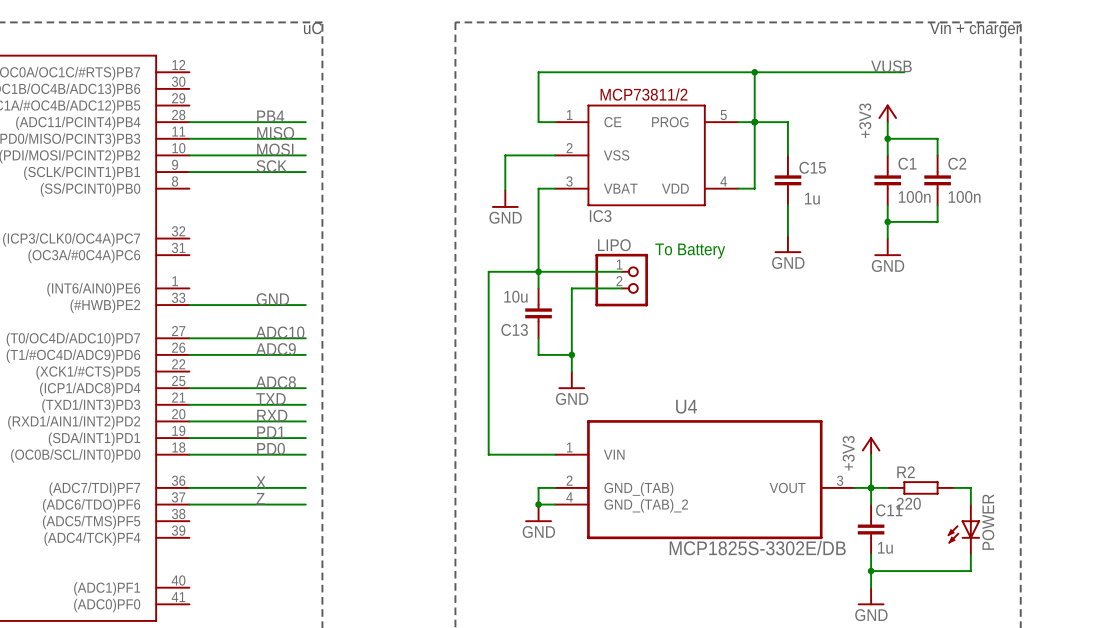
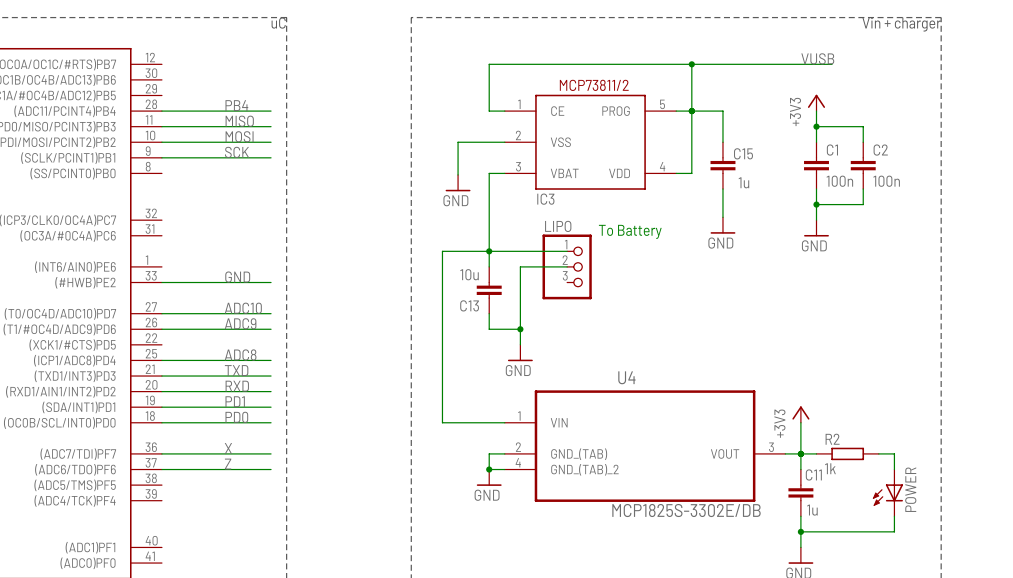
LIPO: (621, 280) -> none
LIPO: none -> (567, 266)
R2 value: 220 (908, 503) -> 1k (830, 468)

